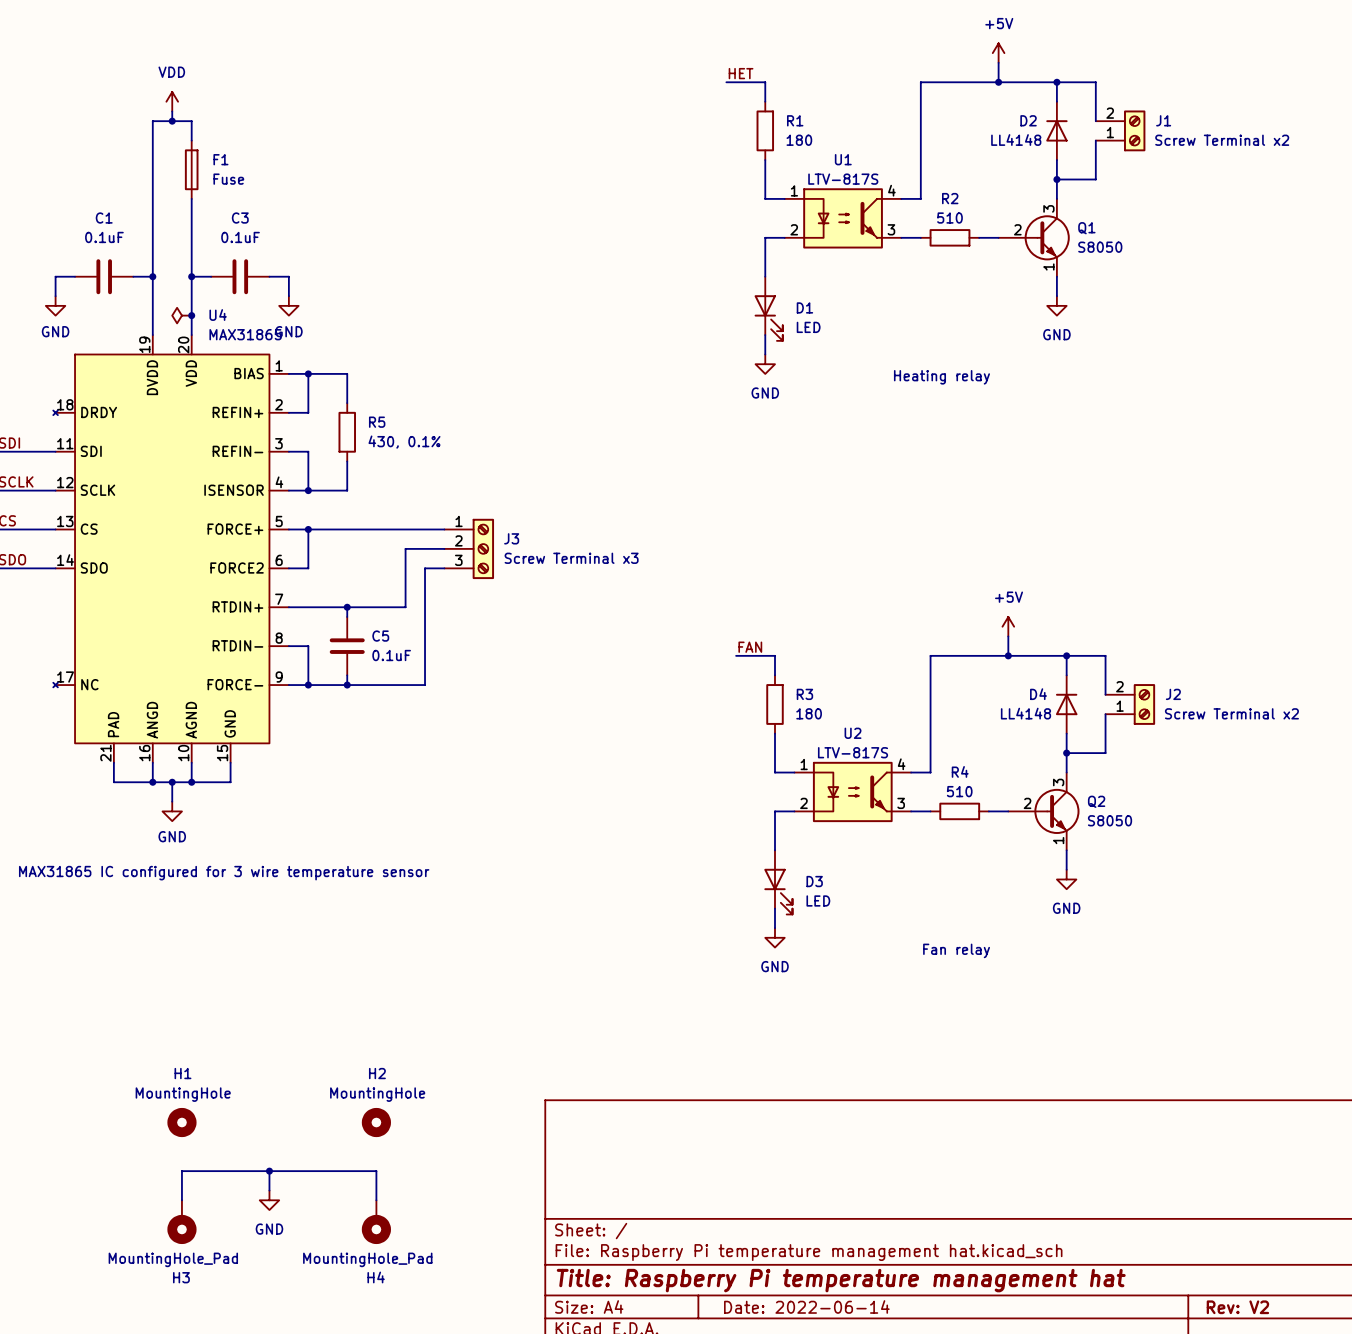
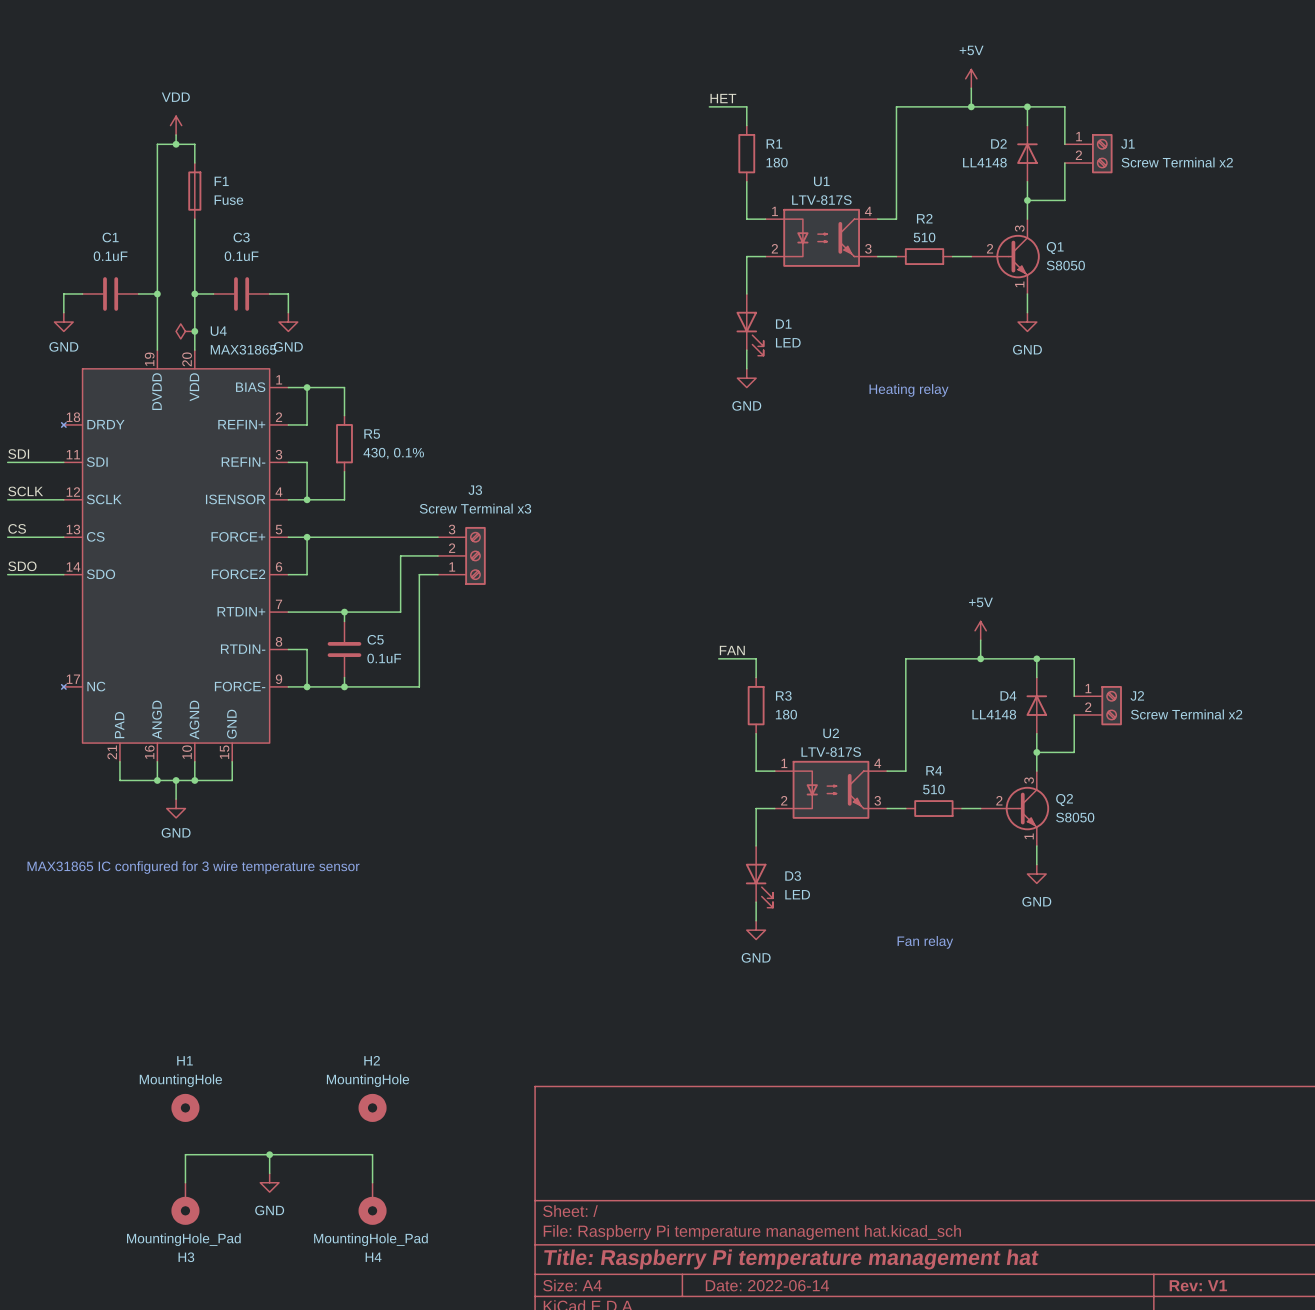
J1 flip: as is (1134, 130) -> up-down (1102, 153)
J3 name position: J3 (511, 538) -> J3 (475, 490)
J3 flip: as is (483, 548) -> up-down (475, 555)
J3 value position: Screw Terminal x3 (571, 558) -> Screw Terminal x3 (475, 508)
J2 flip: as is (1144, 704) -> up-down (1111, 705)
title block: Rev: V2 (1237, 1307) -> Rev: V1 (1198, 1285)

